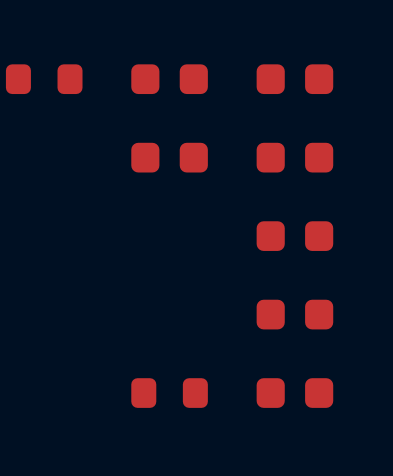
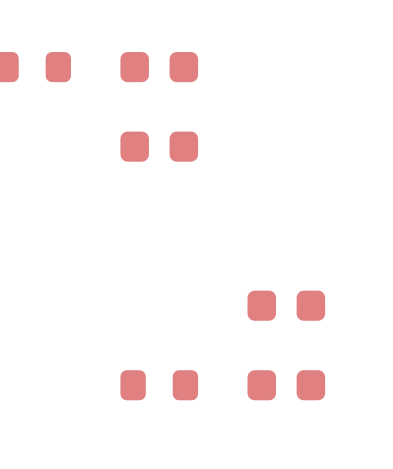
part: (294, 79) -> none
part: (294, 157) -> none
part: (294, 236) -> none

